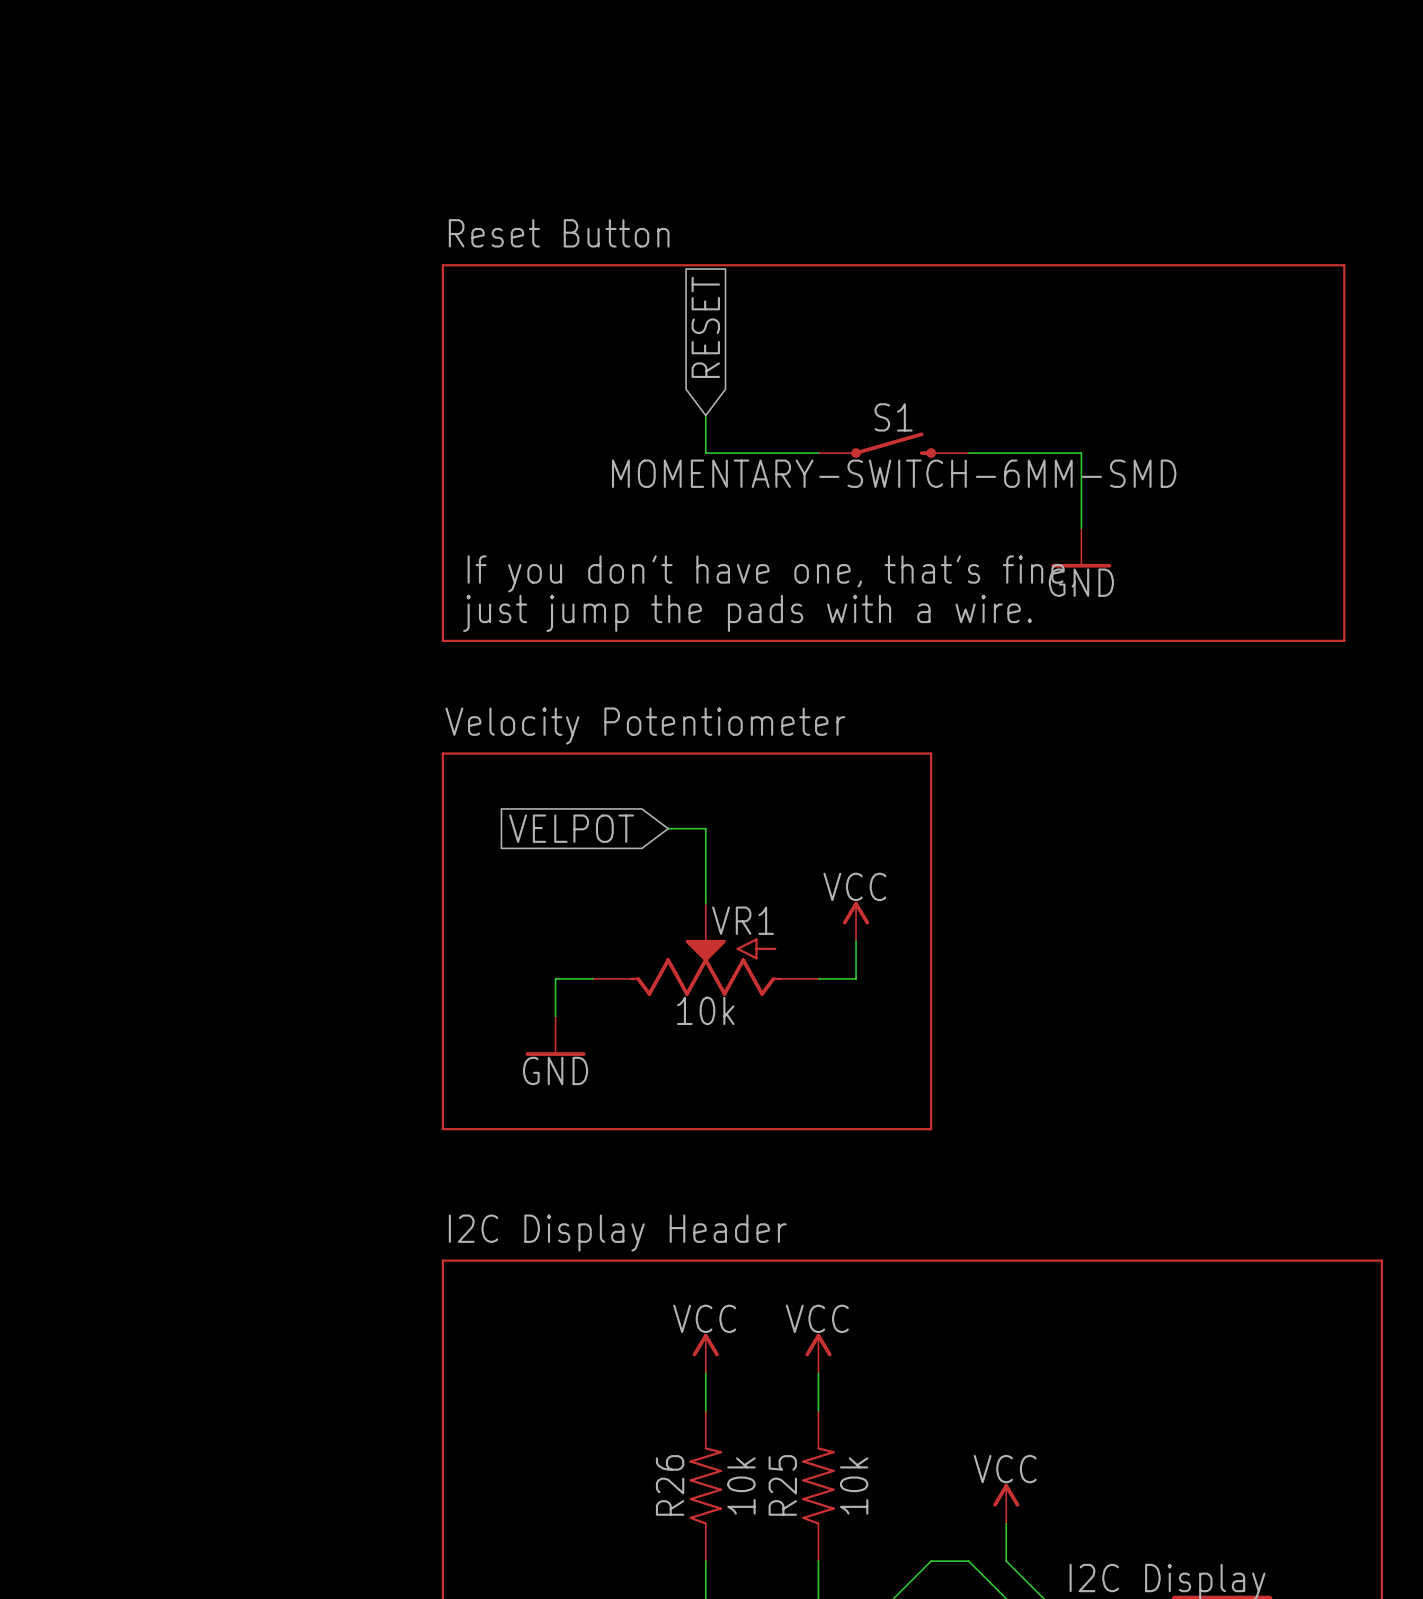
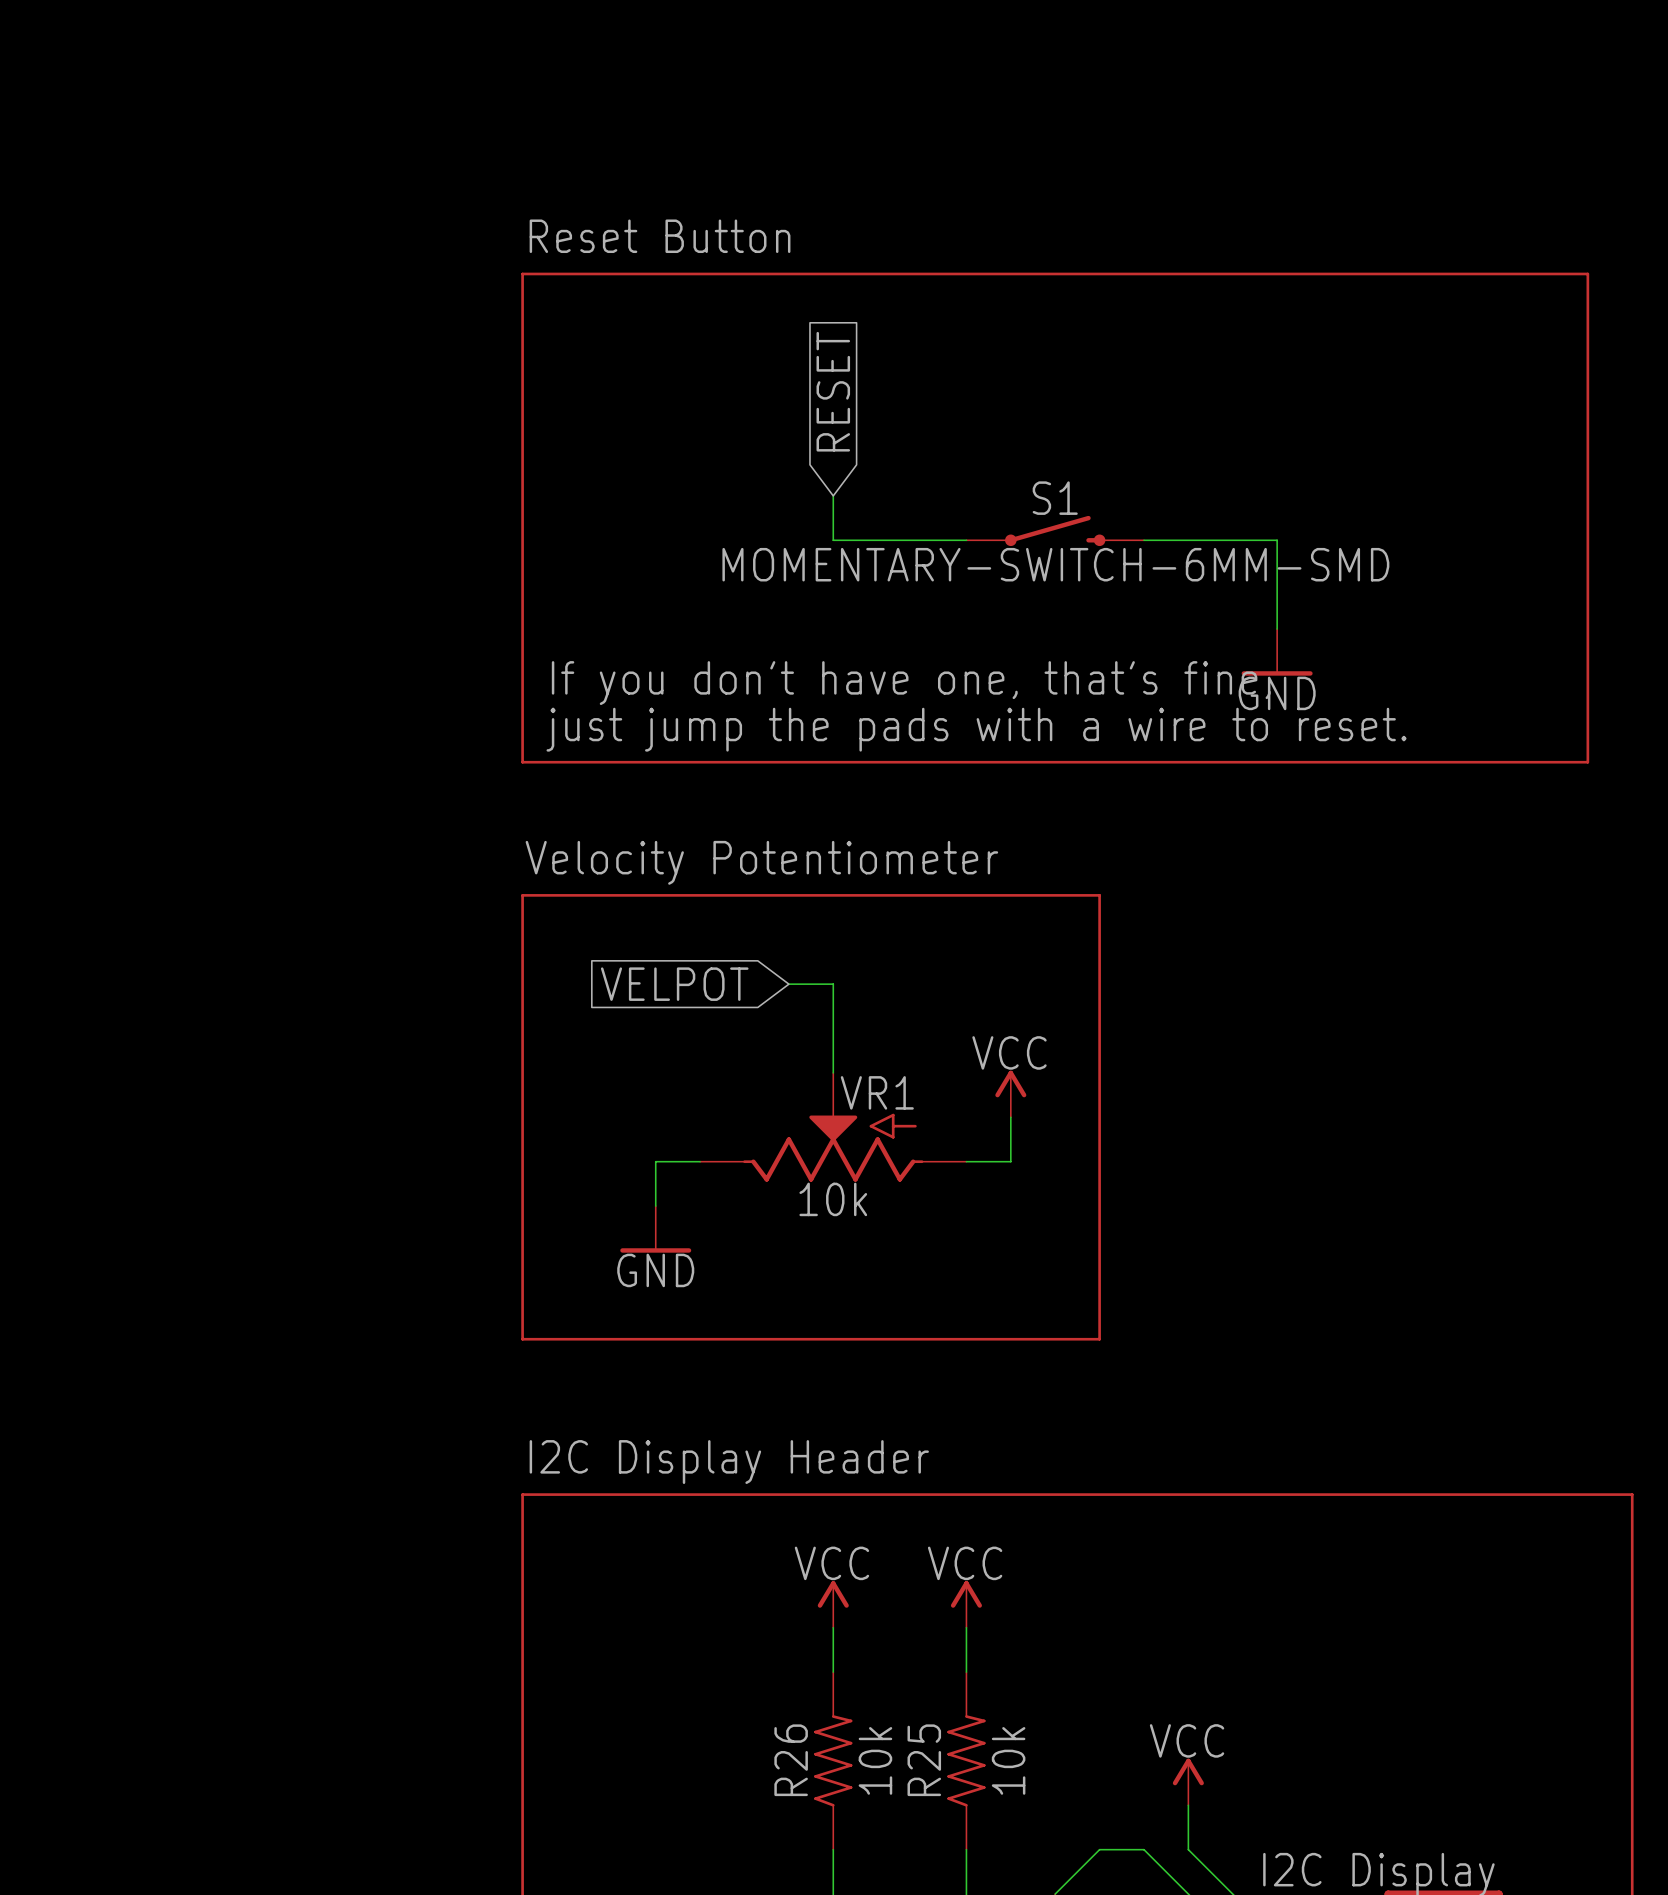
text position: Reset Button (559, 233) -> Reset Button (660, 236)
line: (442, 265) (1344, 265) -> (522, 318) (522, 273) (1587, 273) (1587, 318)
text: just jump the pads with a wire. (747, 613) -> just jump the pads with a wire to reset. (976, 729)

